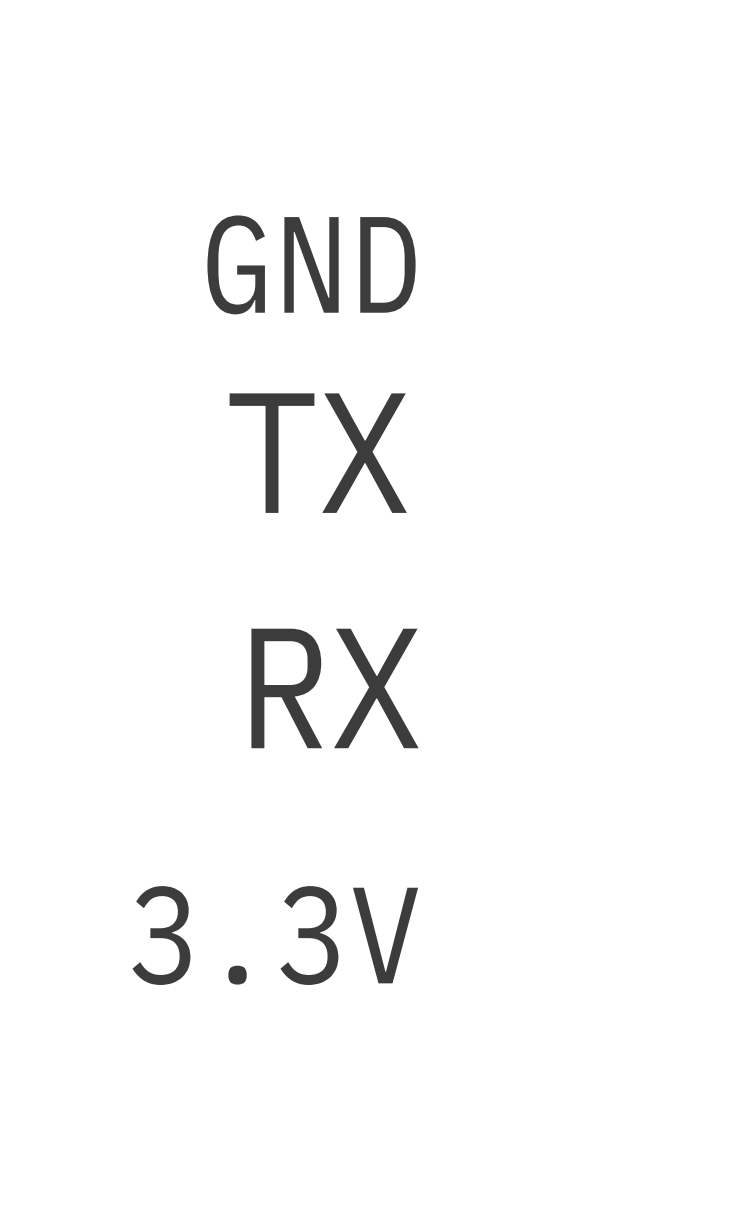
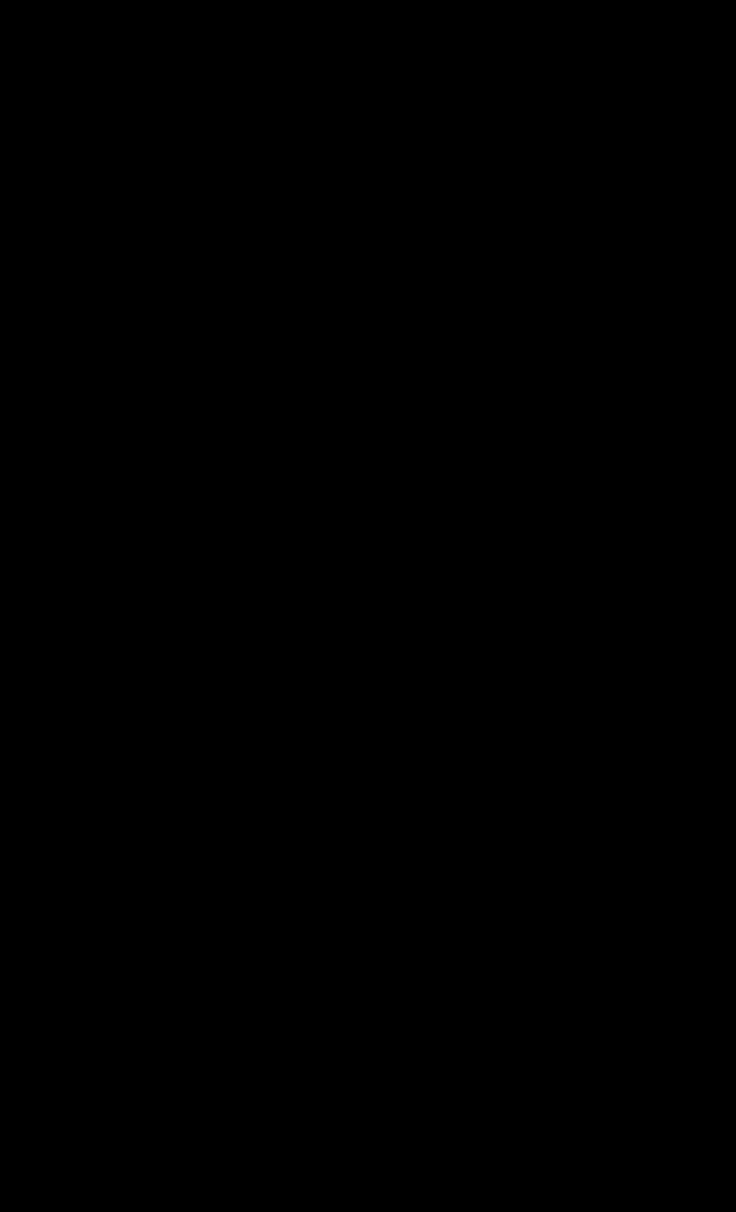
text: GND (311, 264) -> none
text: TX (318, 453) -> none
text: RX (335, 688) -> none
text: 3.3V (275, 935) -> none

